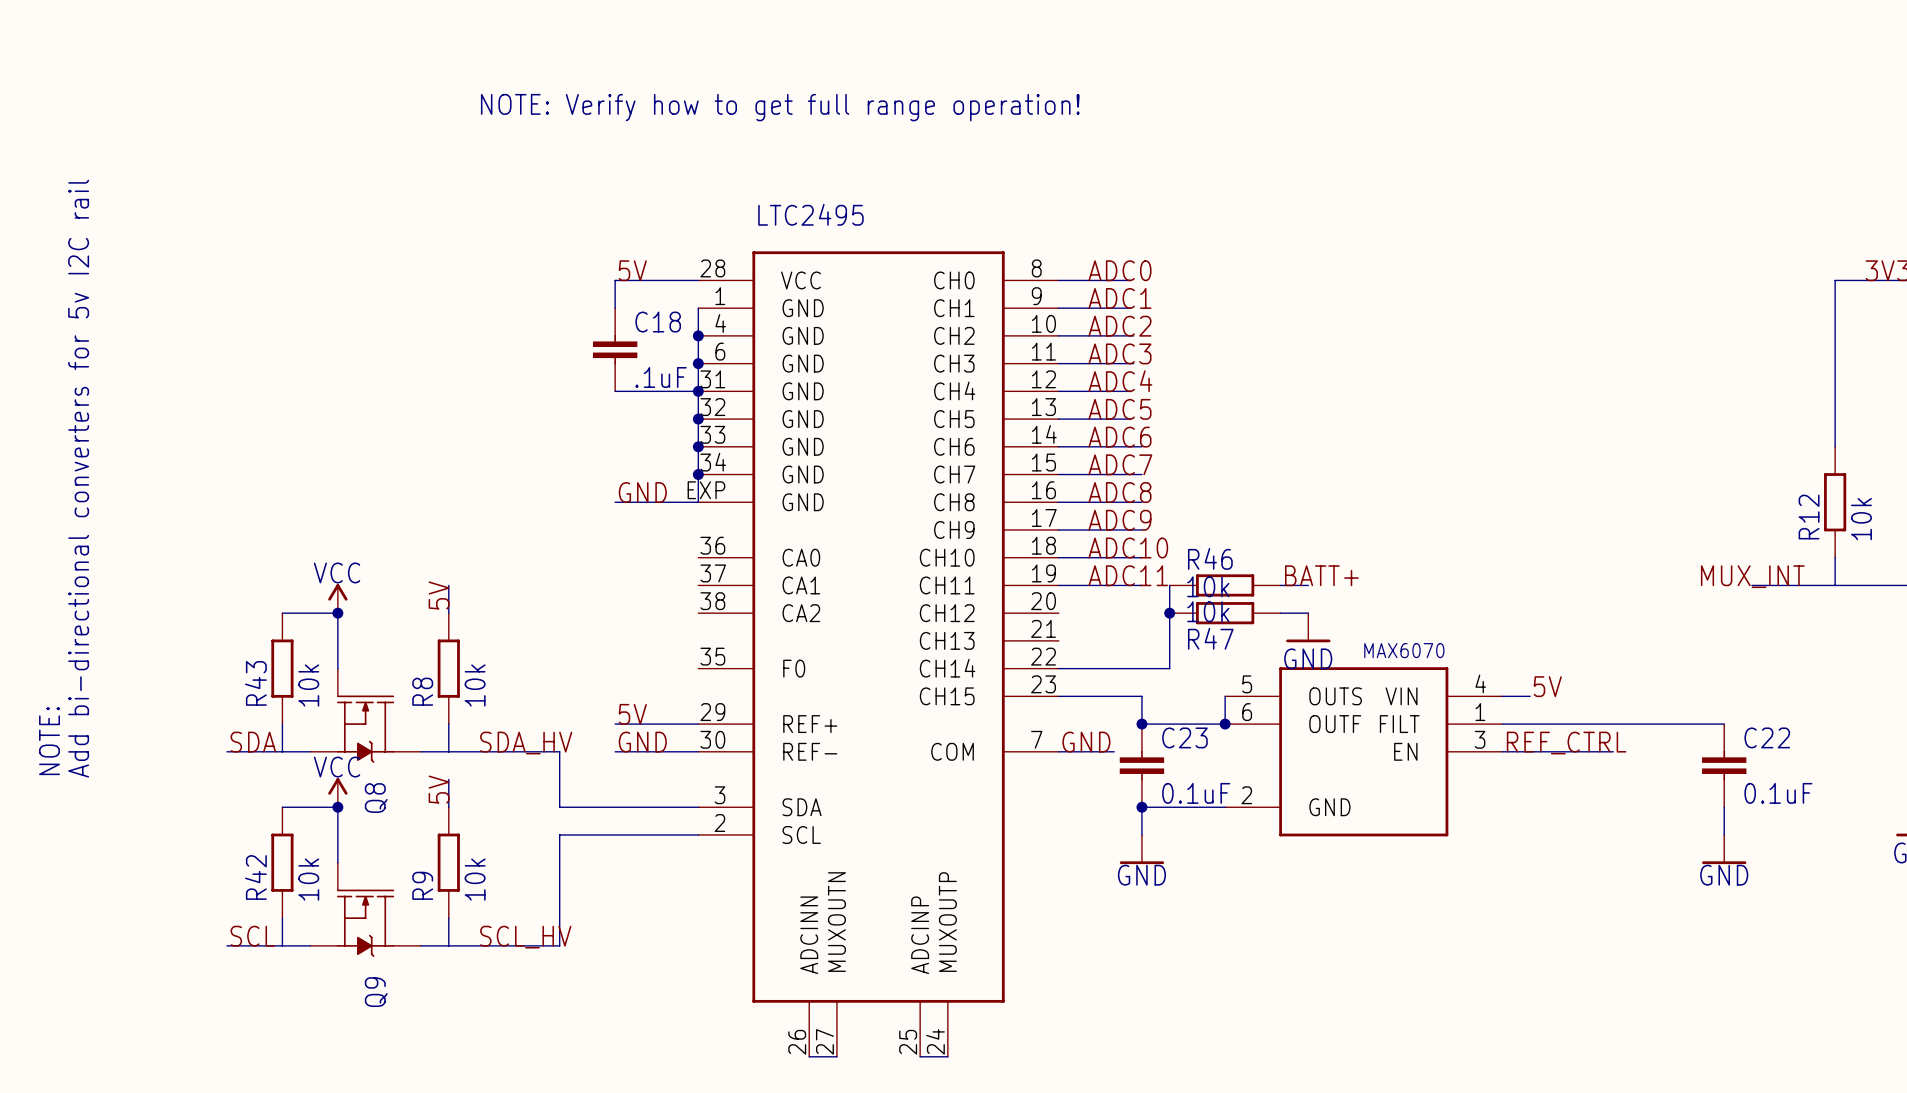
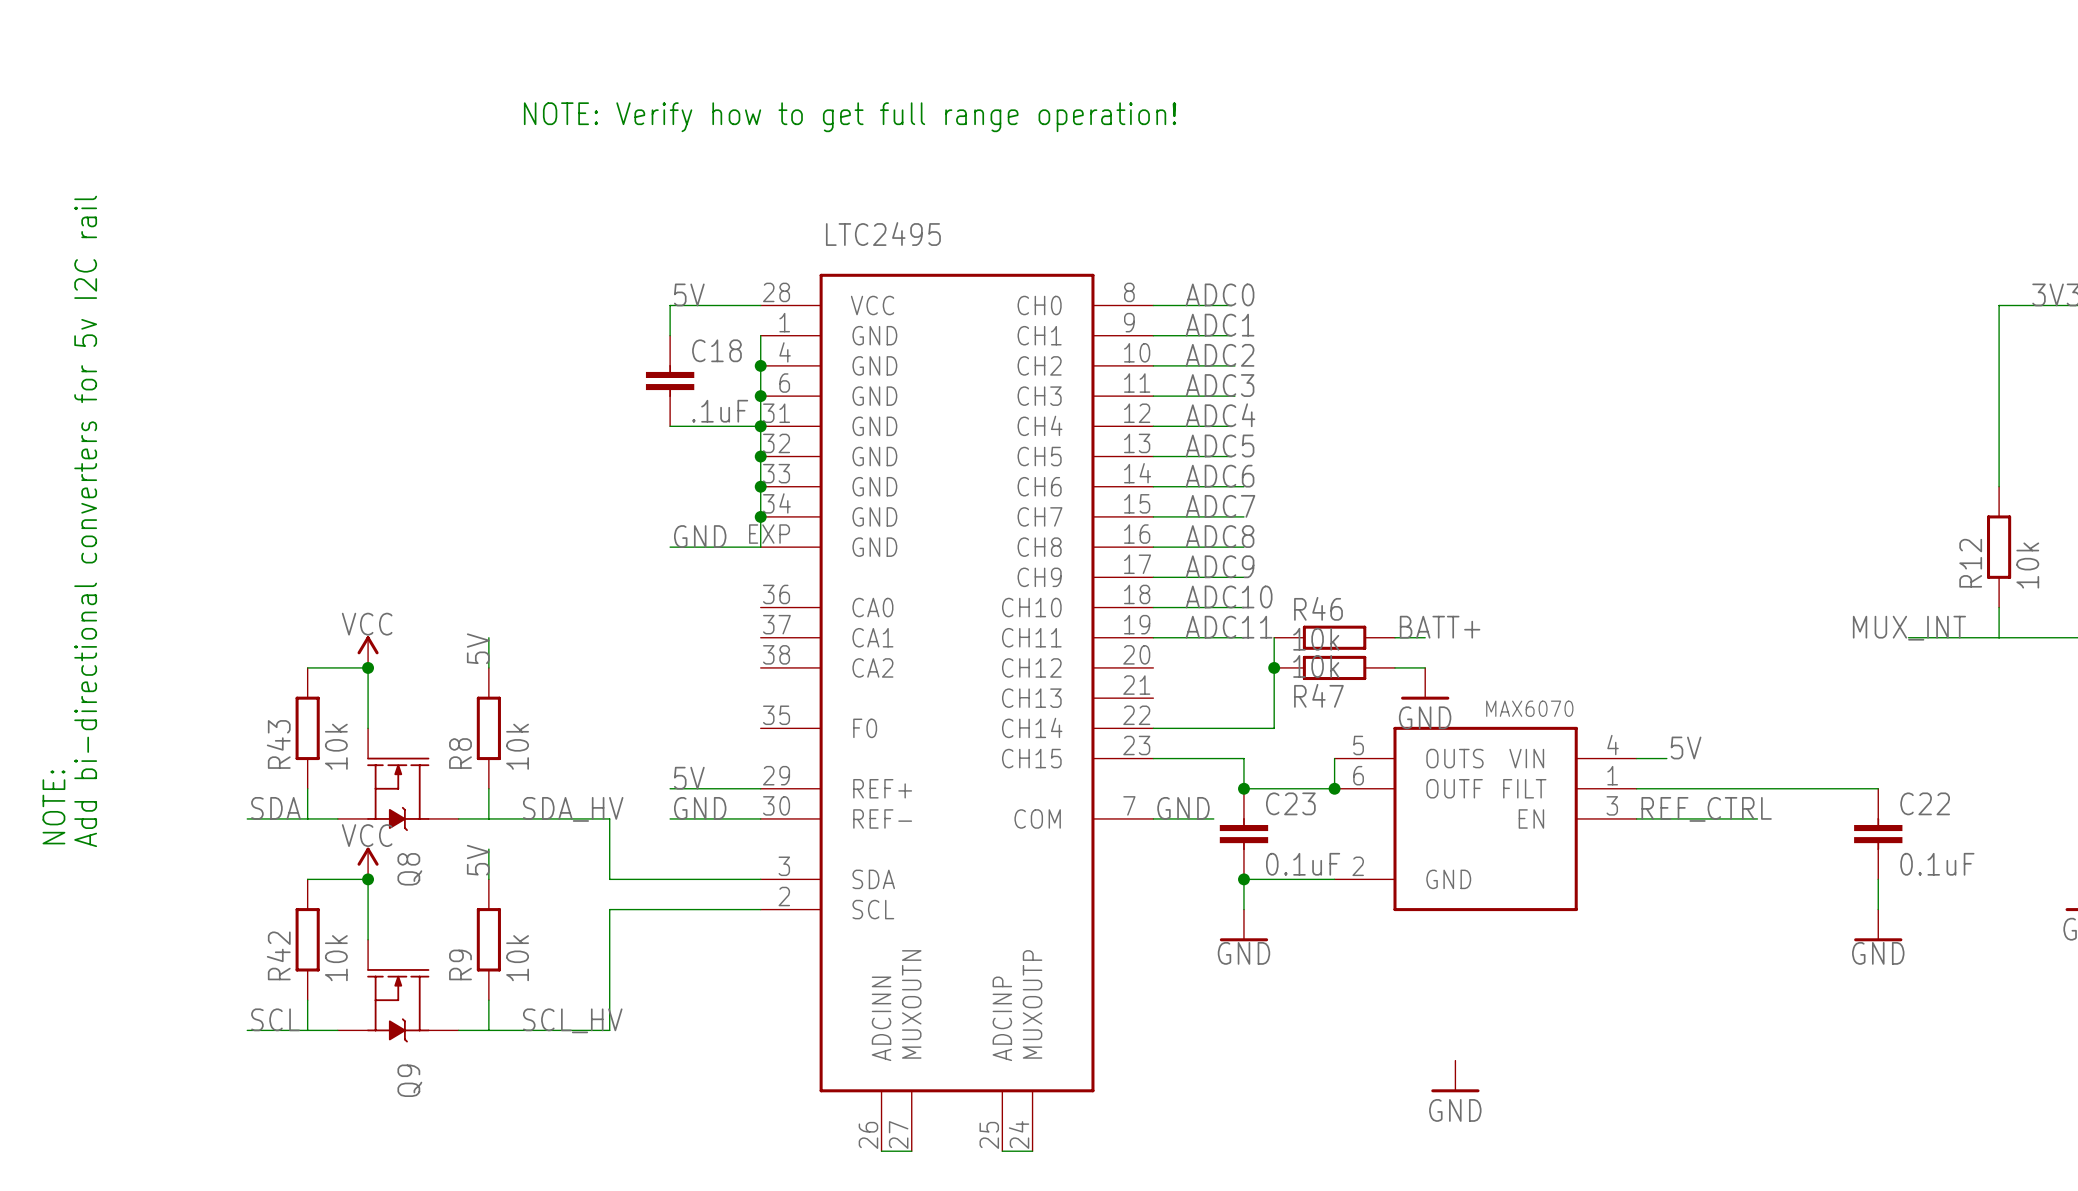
power symbol: none -> GND (1455, 1076)

